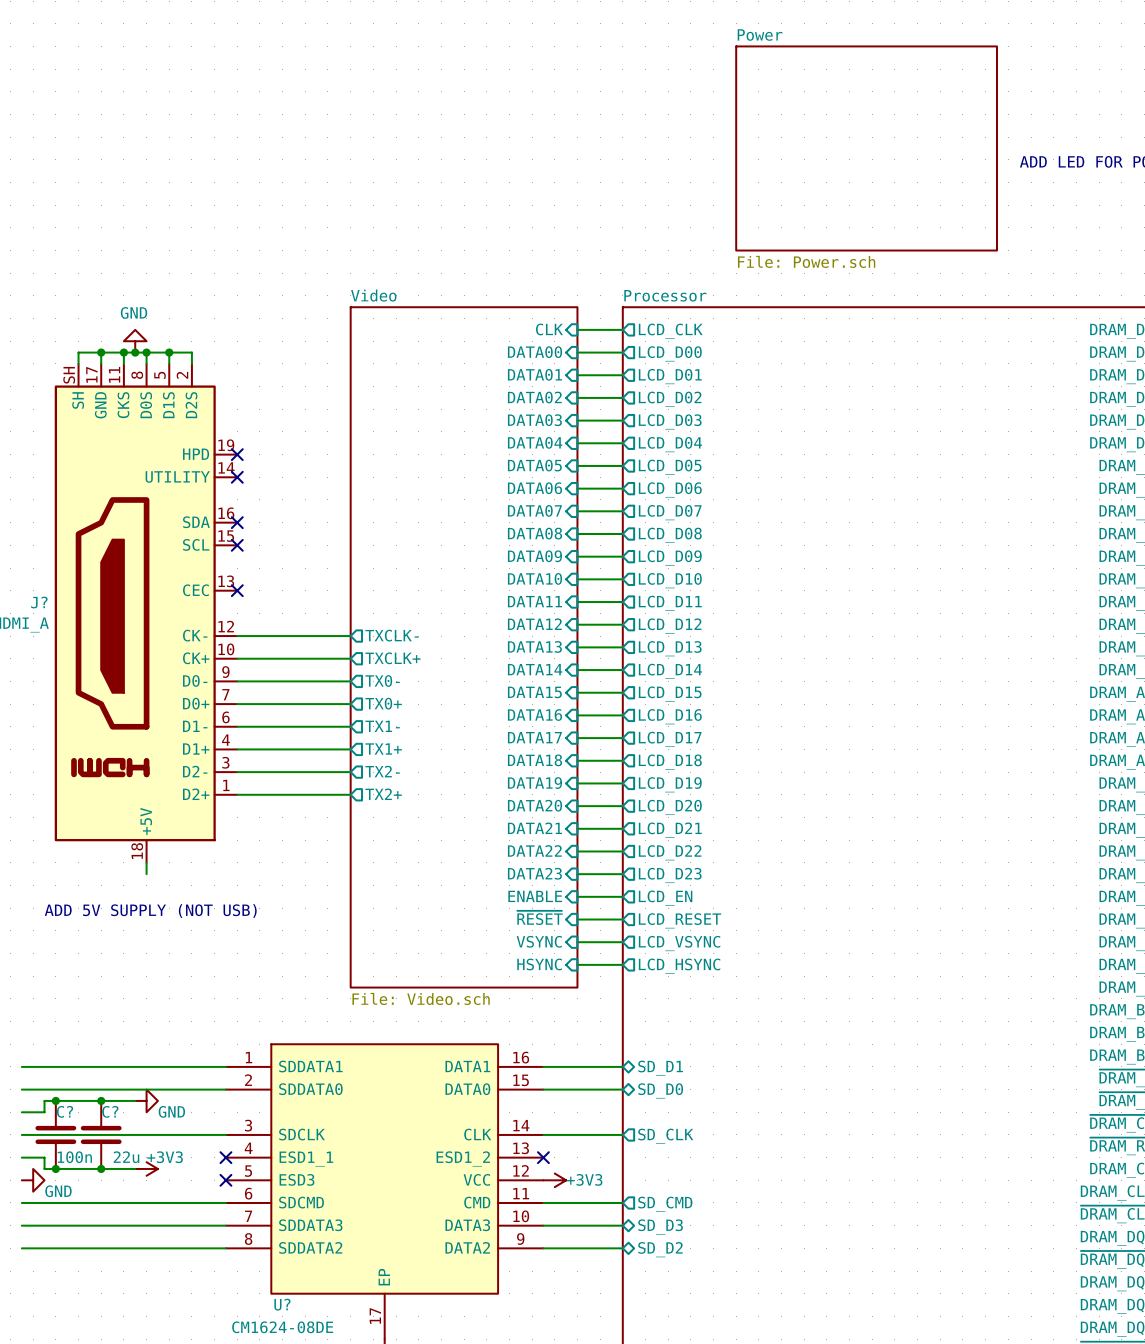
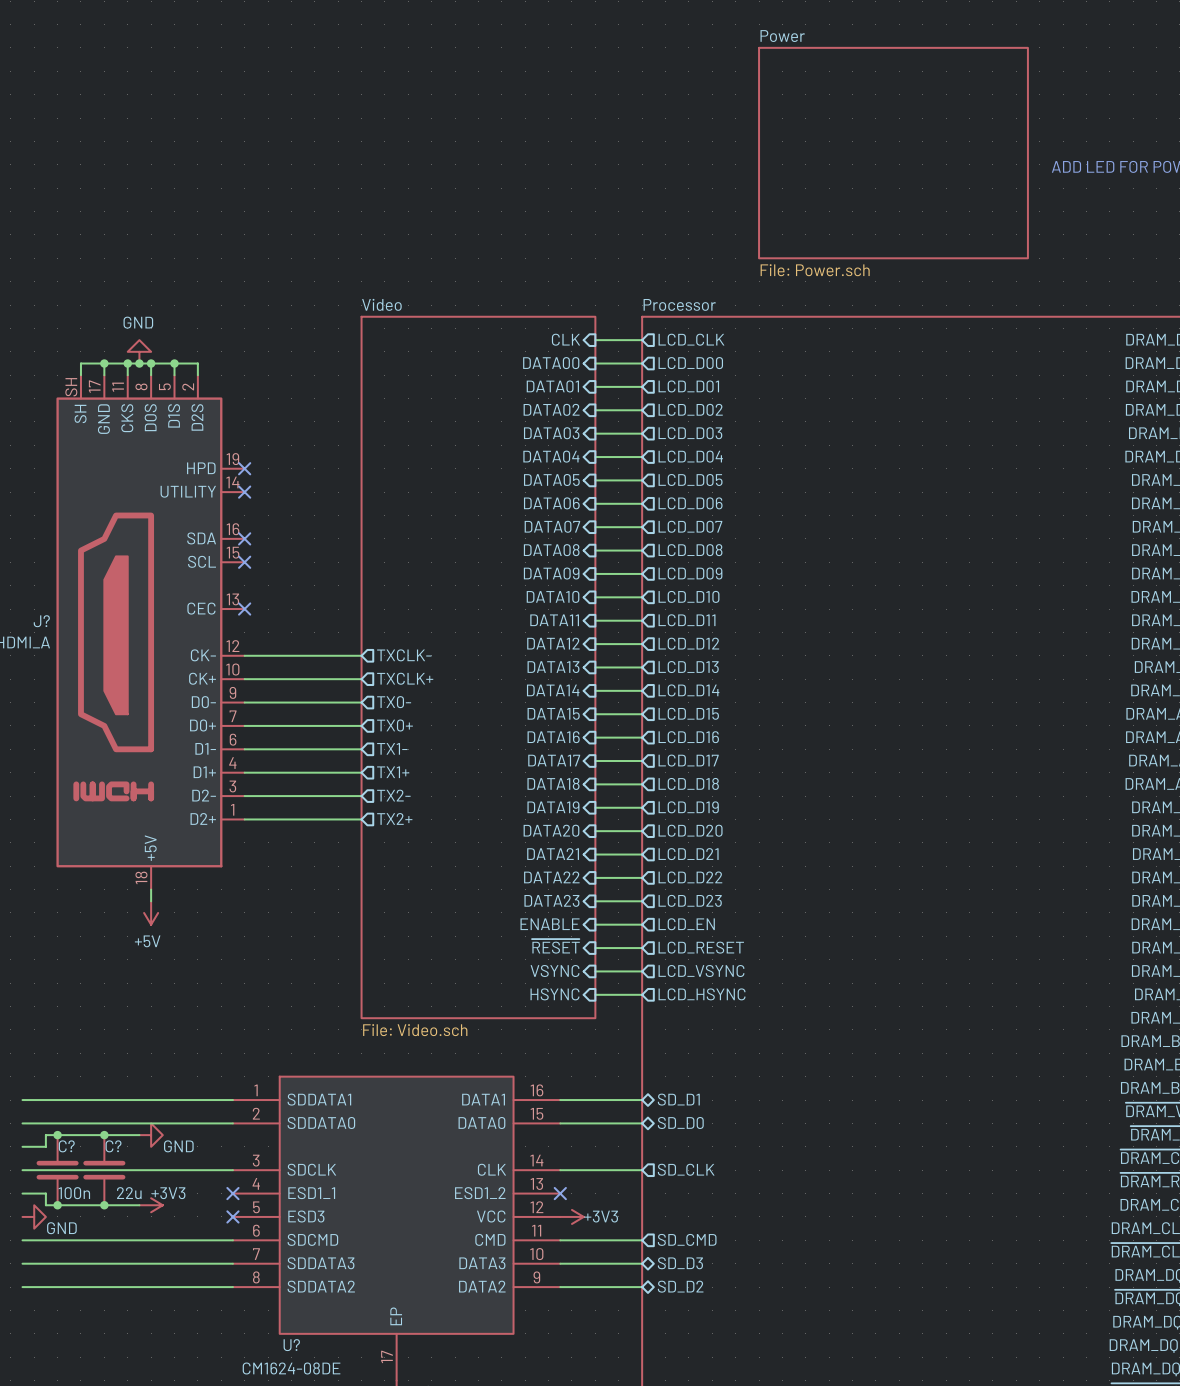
power symbol: none -> +5V (151, 912)
text: ADD 5V SUPPLY (NOT USB) (150, 911) -> none

